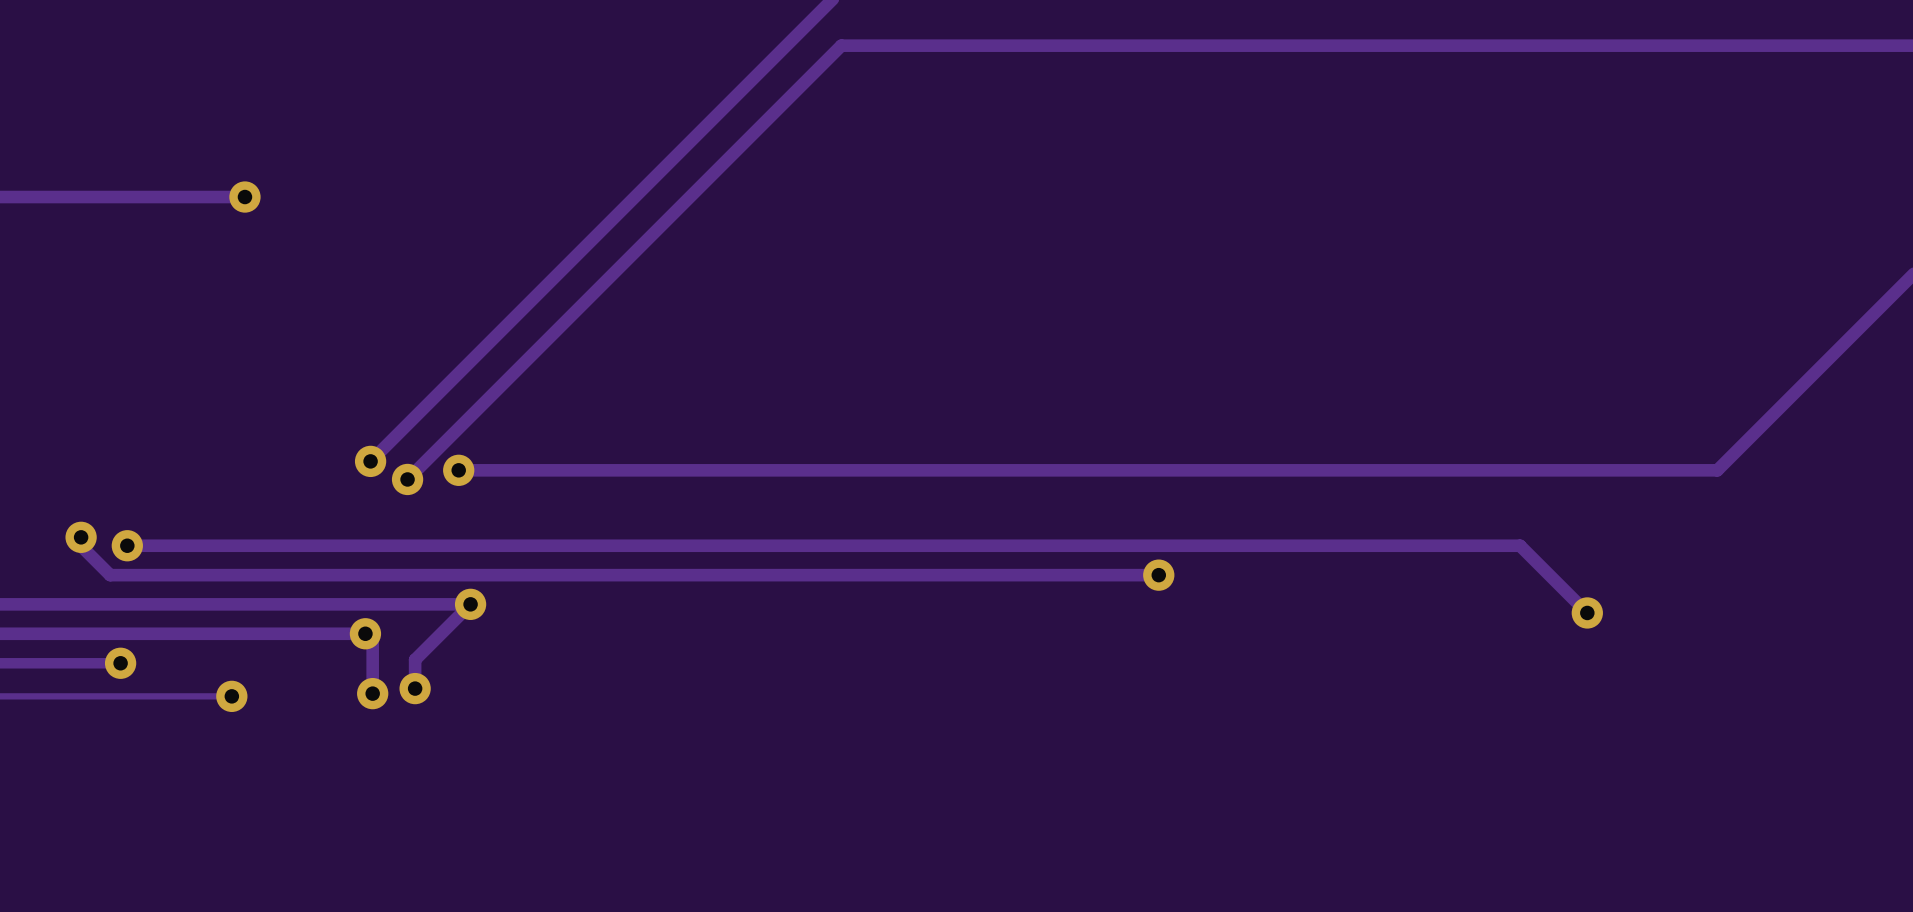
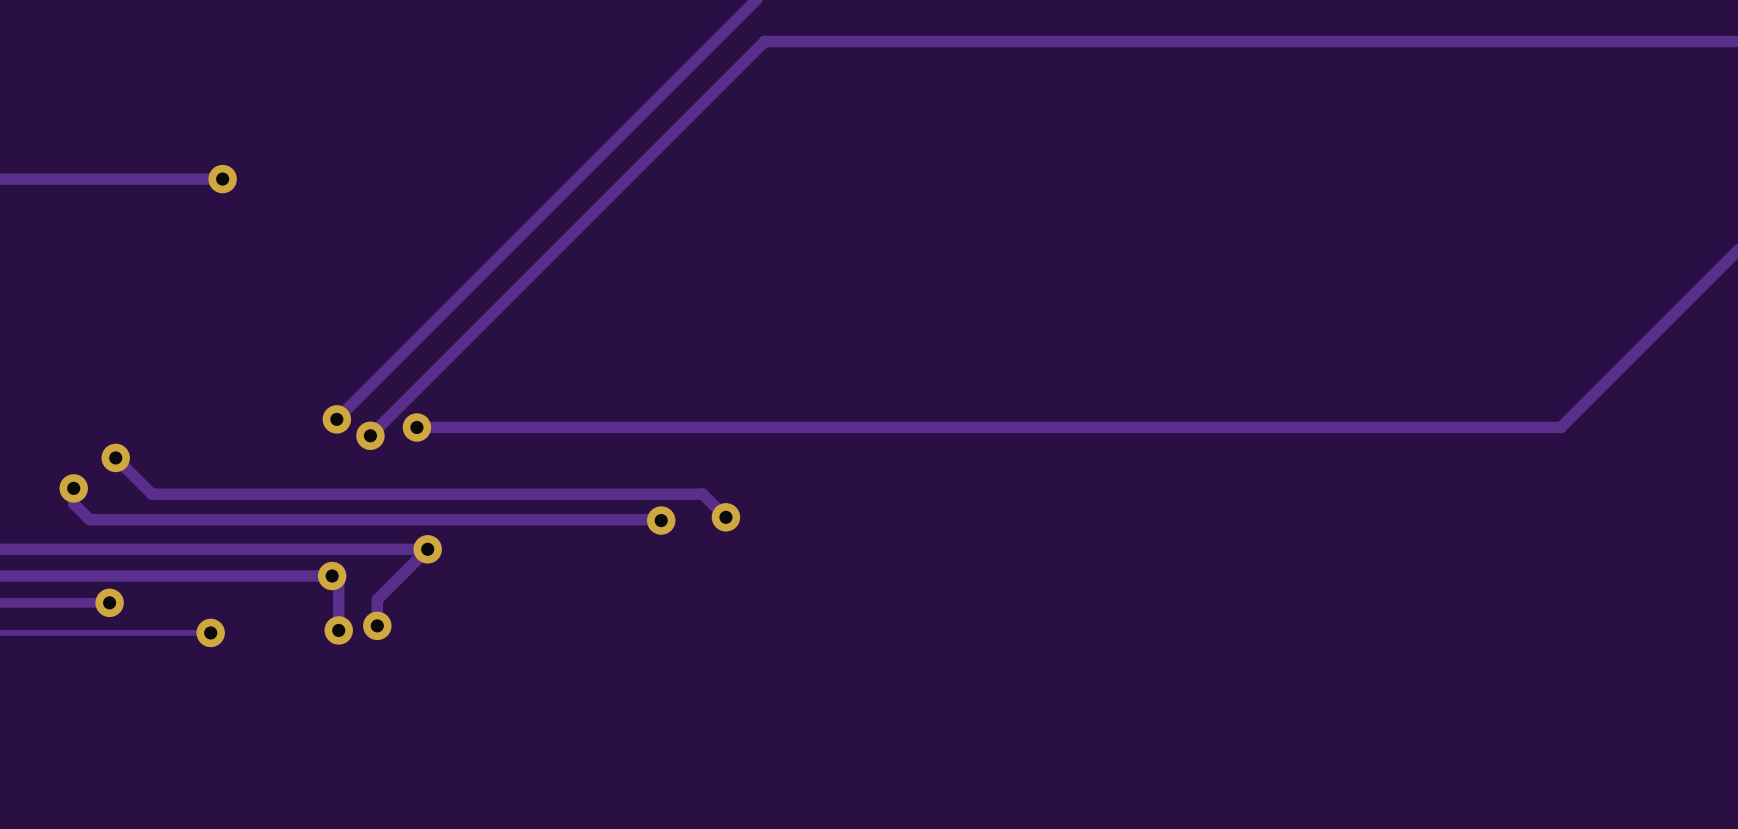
track: none -> (115, 457) (152, 494) (702, 494) (725, 517)
track: (127, 545) (1520, 545) (1587, 612) -> none
via position: (127, 545) -> (115, 457)
track: (81, 546) (110, 575) (1158, 575) -> (73, 496) (73, 503) (89, 519) (661, 520)
via: none -> (725, 517)
via: none -> (661, 520)
via: (1158, 575) -> none
via: (1587, 612) -> none

